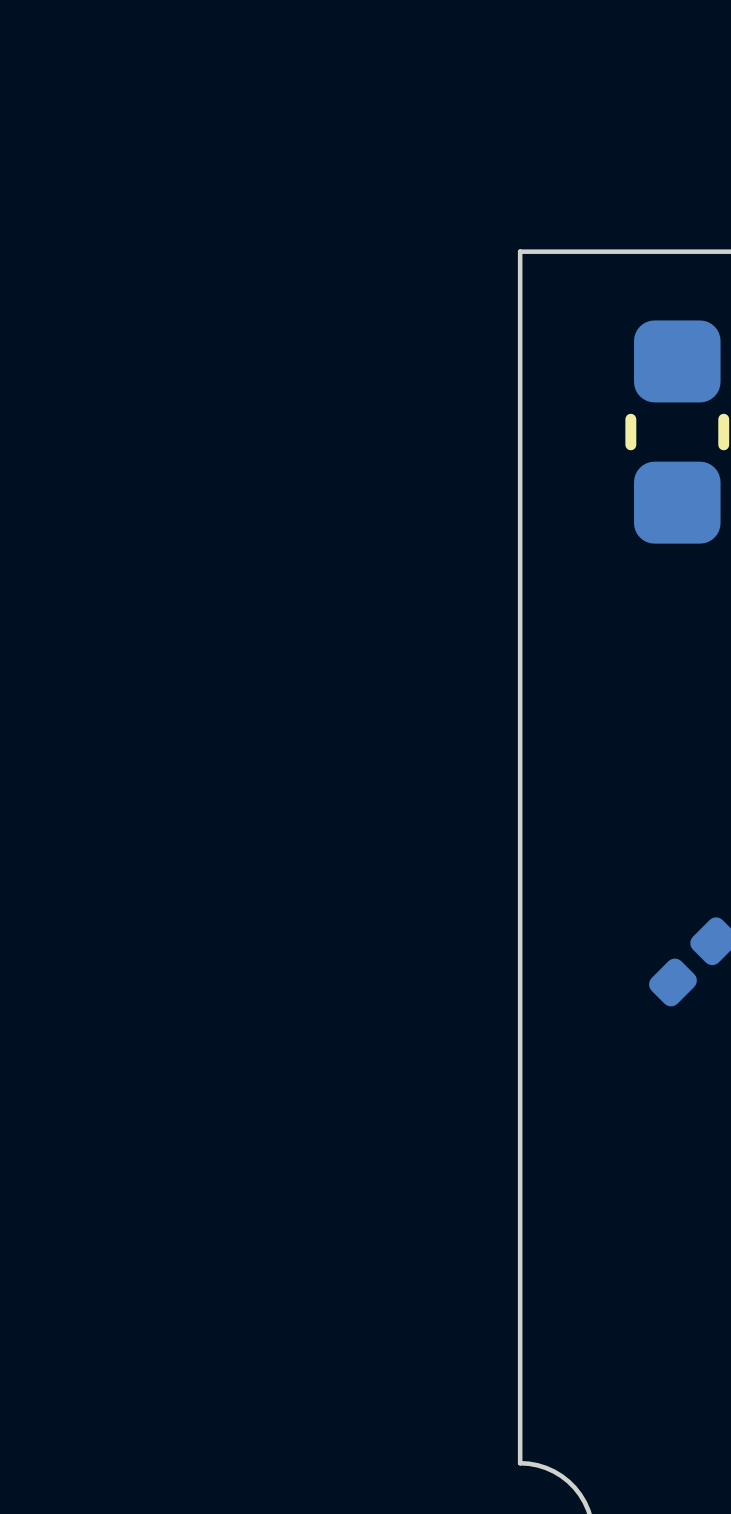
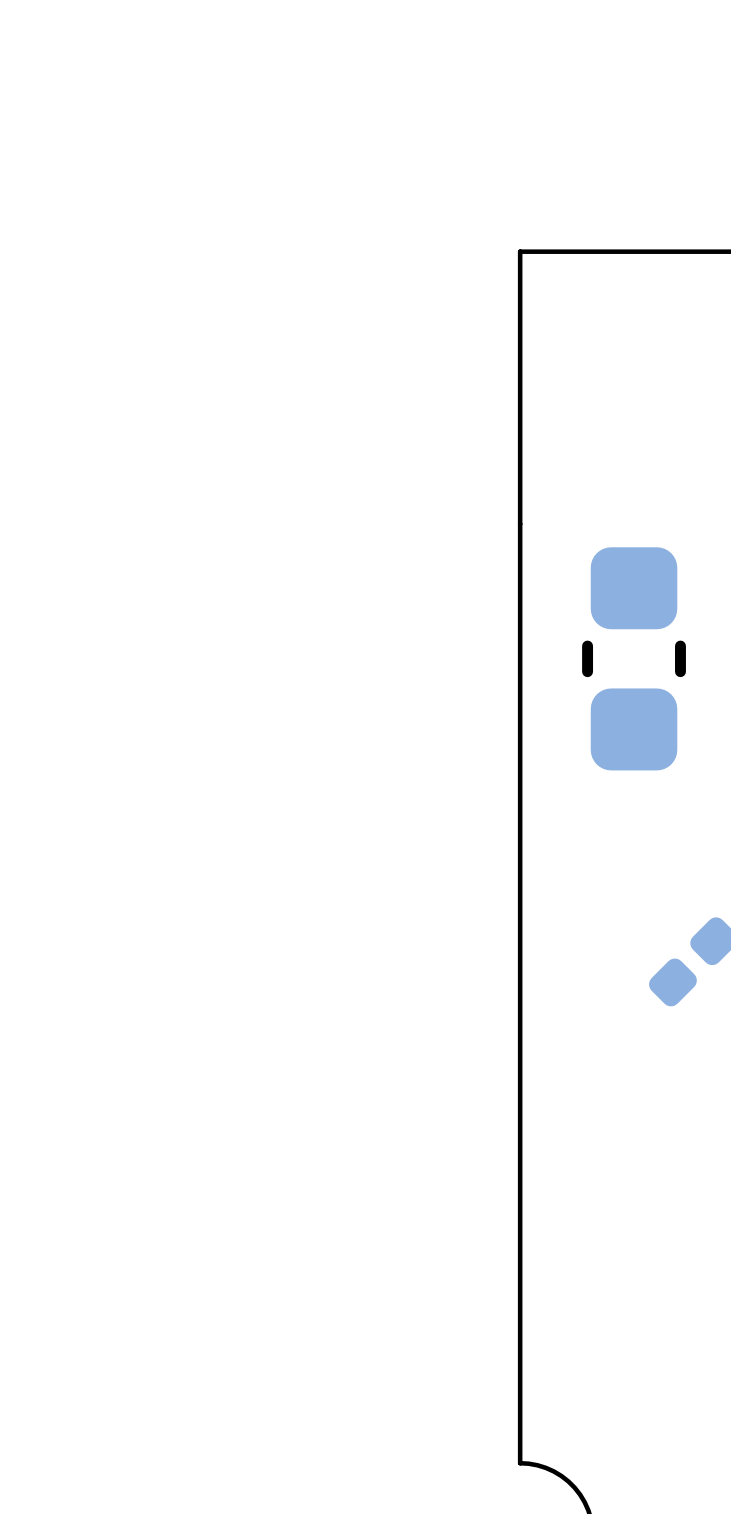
part: (677, 432) -> none
part: none -> (634, 658)

